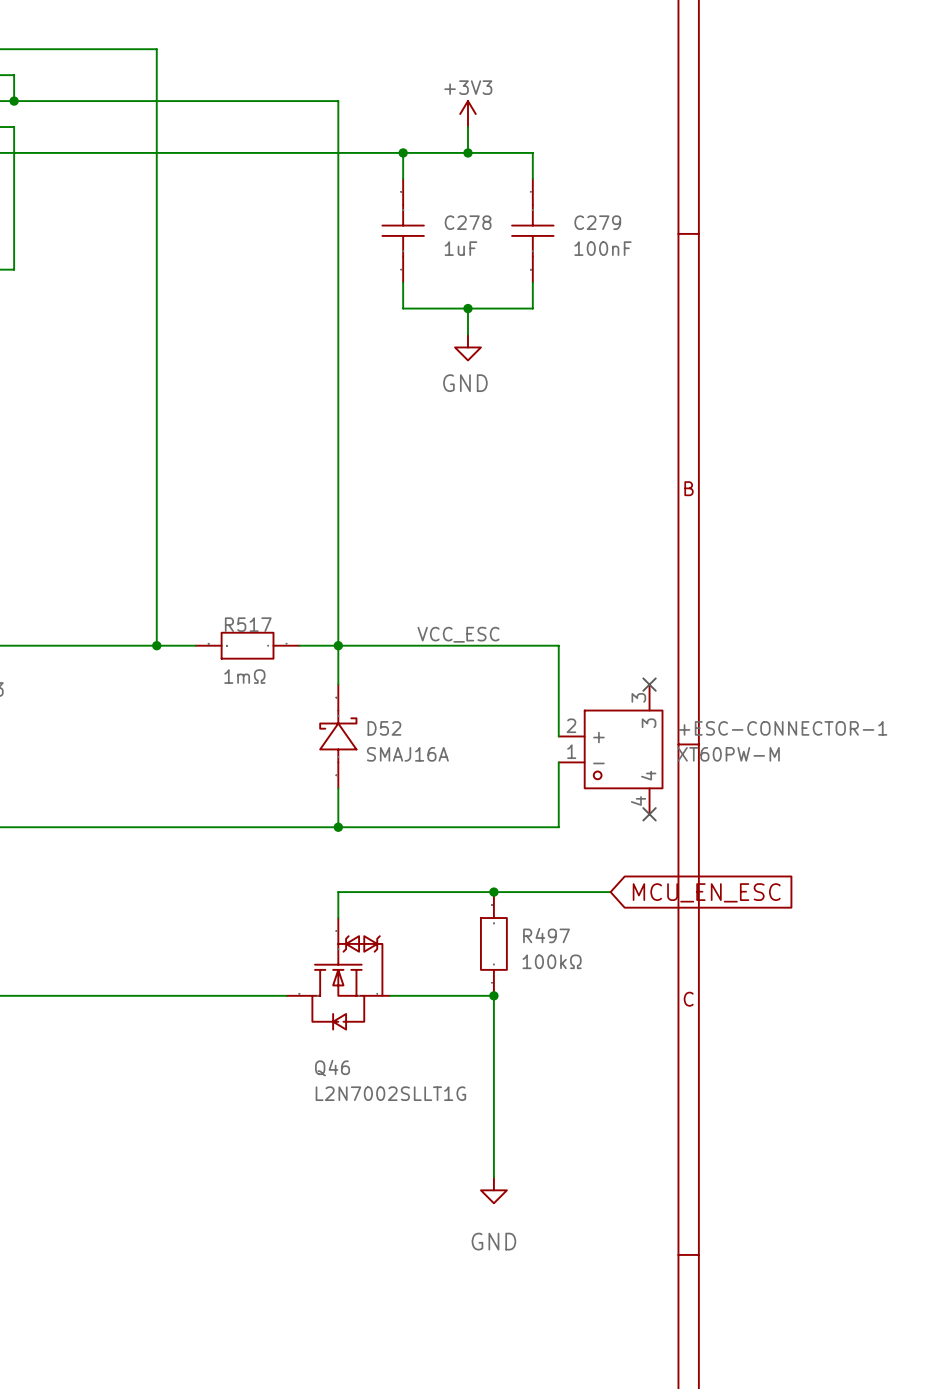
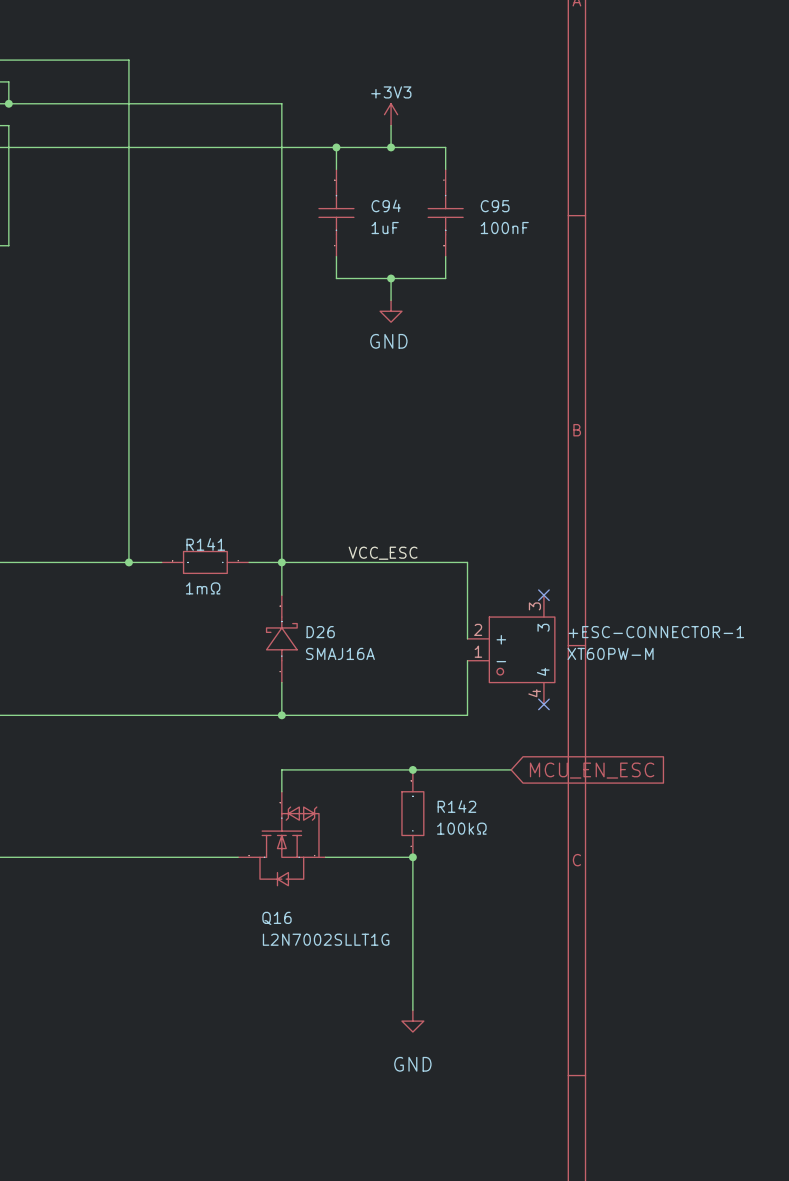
C278 name: C278 (468, 222) -> C94 (386, 205)
C279 name: C279 (597, 222) -> C95 (495, 206)
R517 name: R517 (248, 624) -> R141 (205, 544)
D52 name: D52 (384, 728) -> D26 (320, 632)
R497 name: R497 (546, 935) -> R142 (456, 806)
Q46 name: Q46 (332, 1068) -> Q16 (276, 918)

